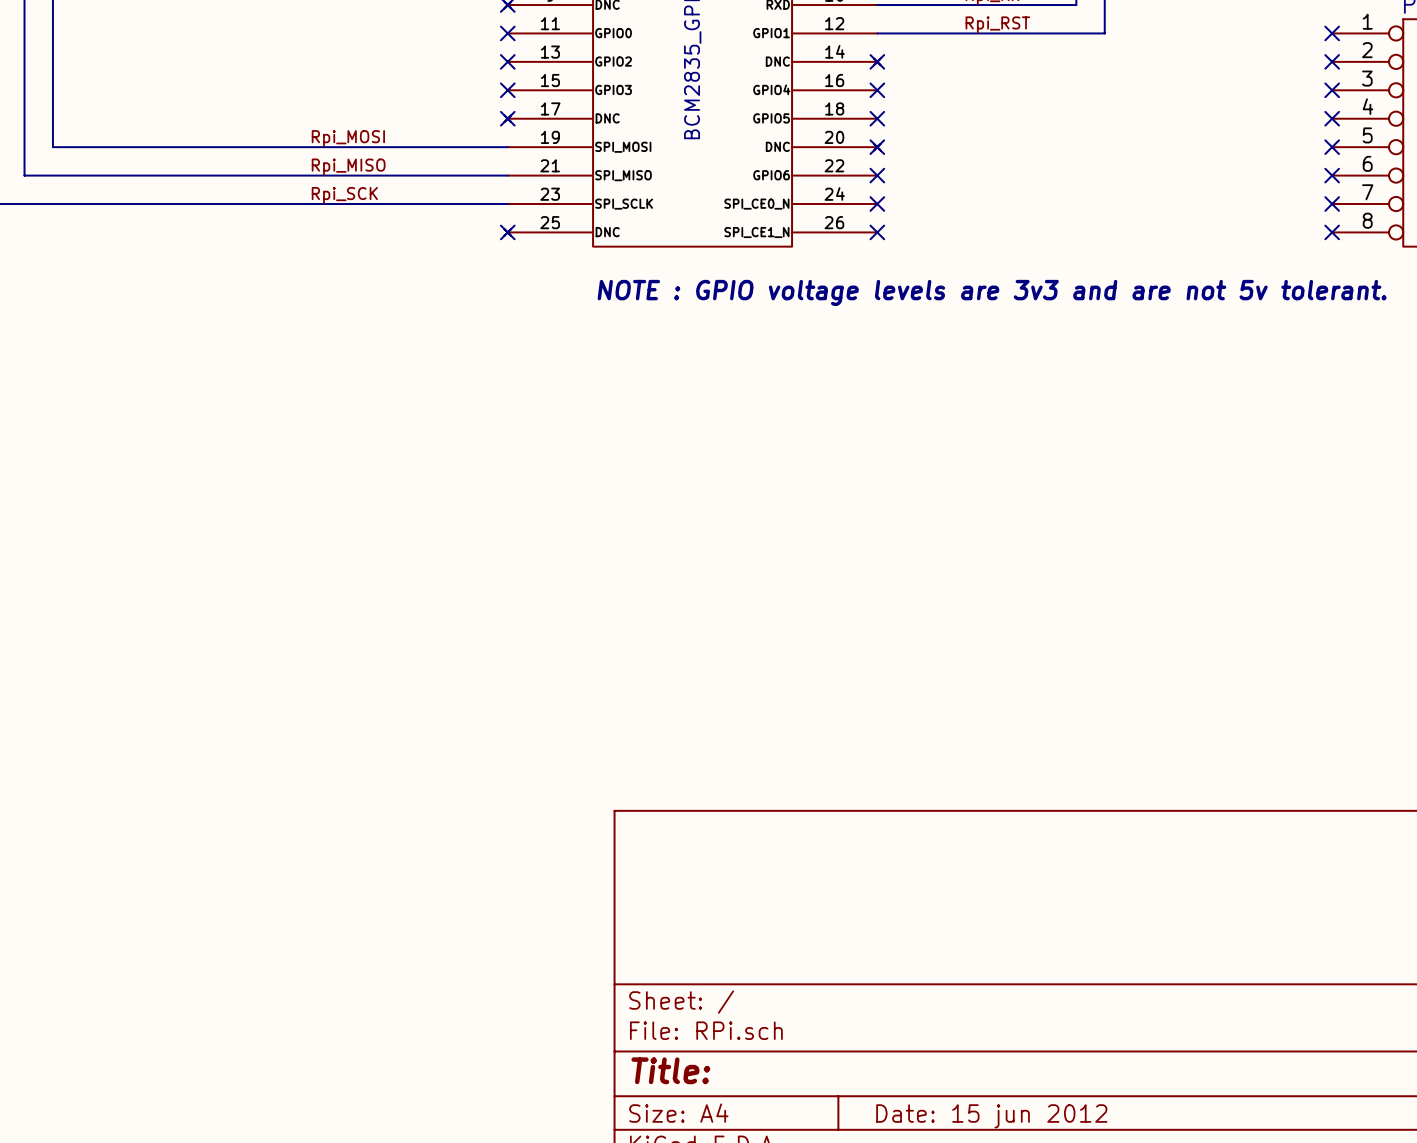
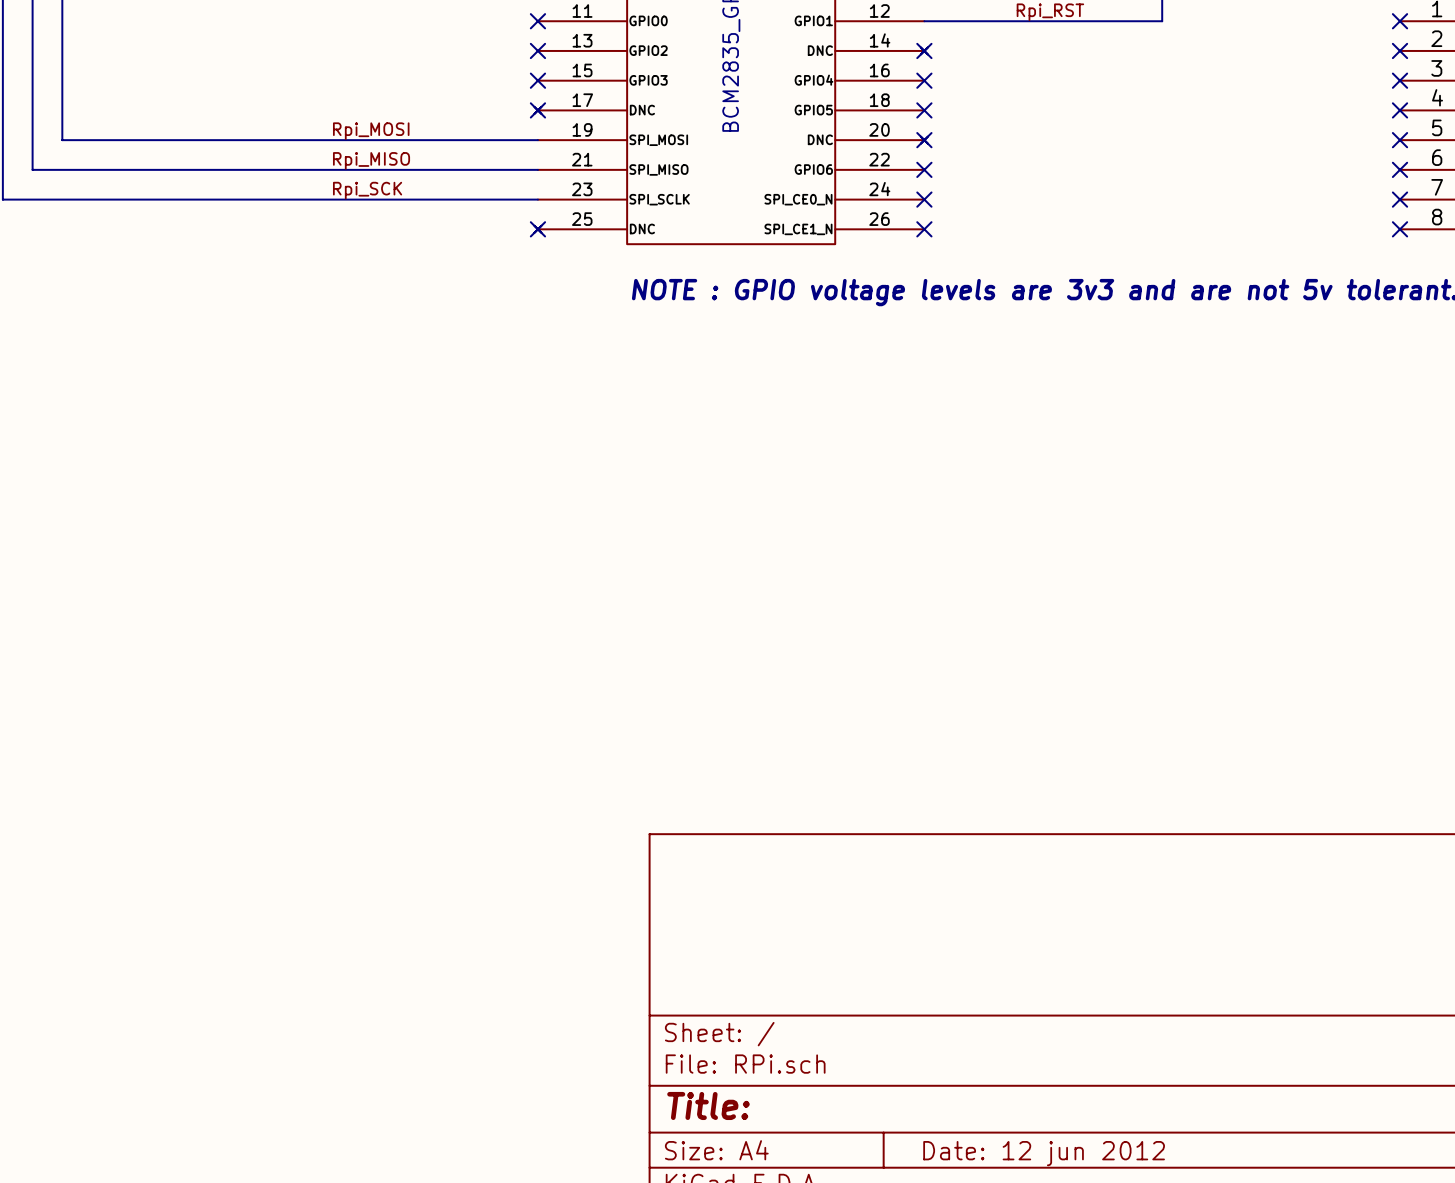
title block: Date: 15 jun 2012 (991, 1116) -> Date: 12 jun 2012 (1044, 1153)

